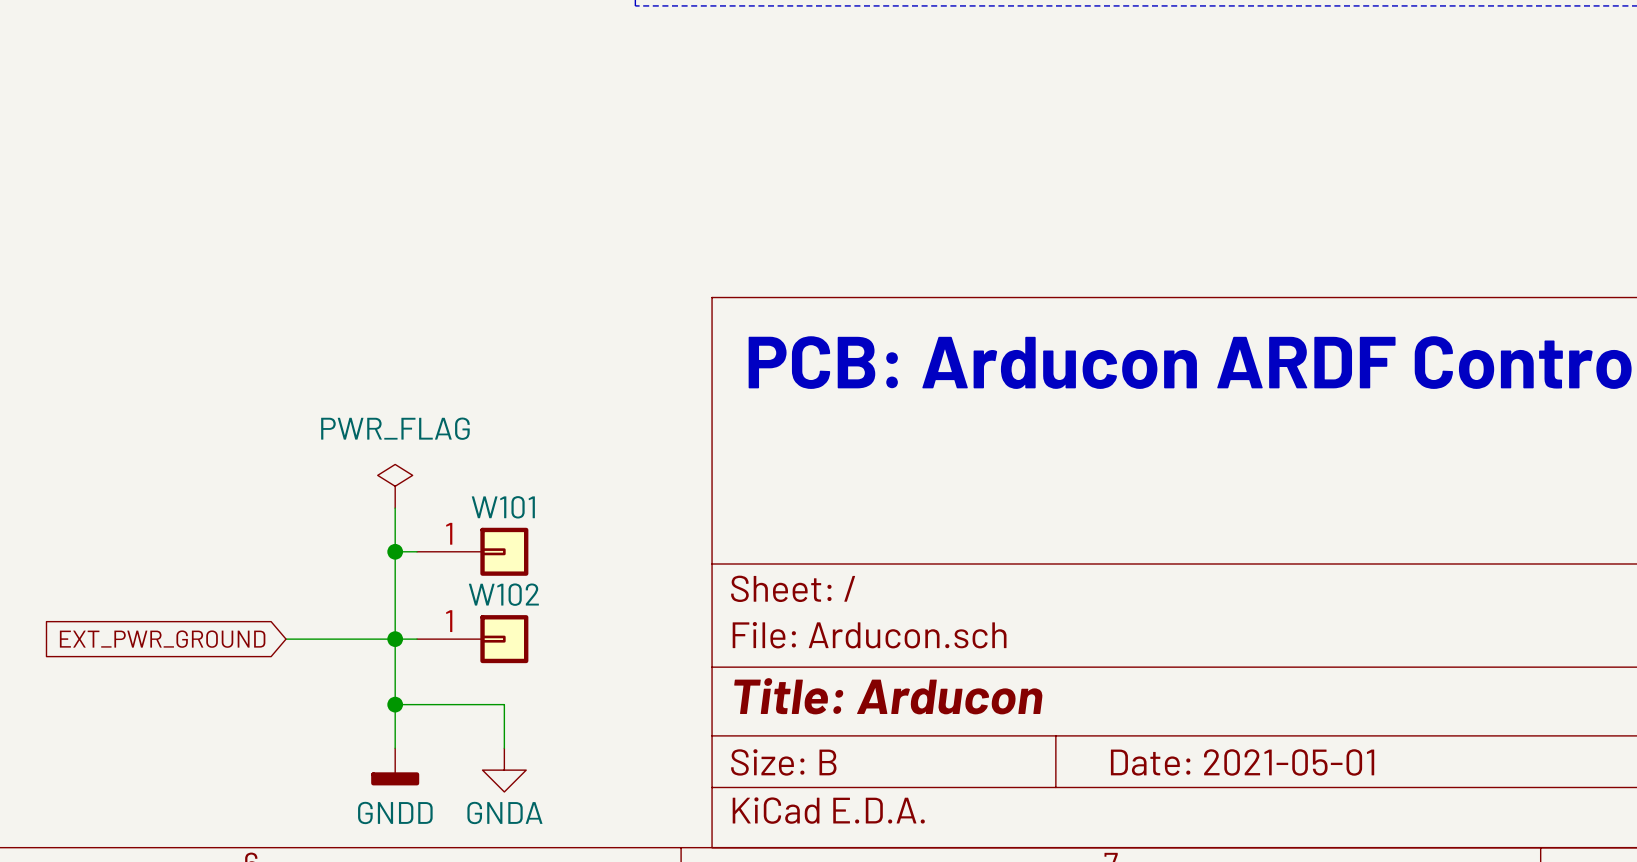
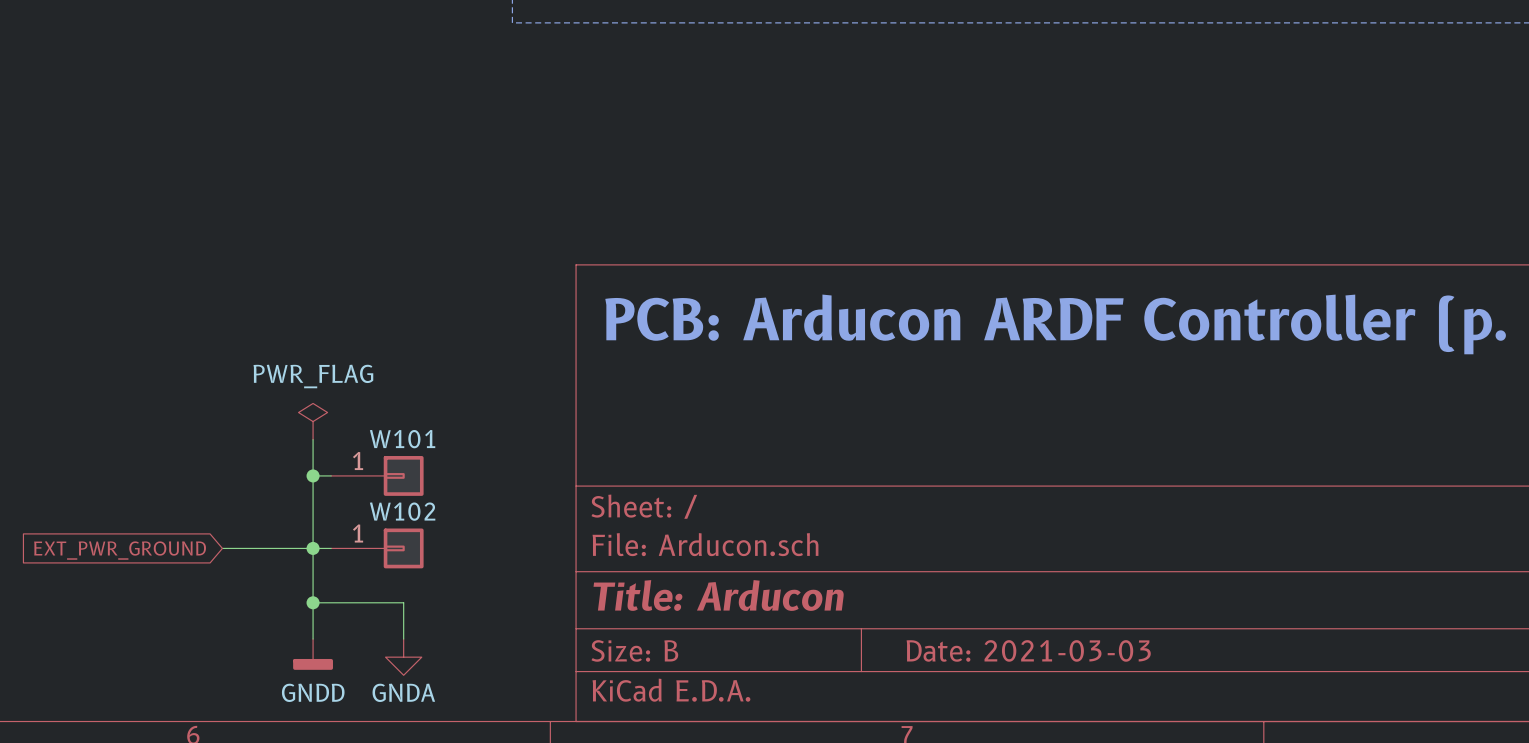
title block: Date: 2021-05-01 (1242, 762) -> Date: 2021-03-03 (1028, 650)

